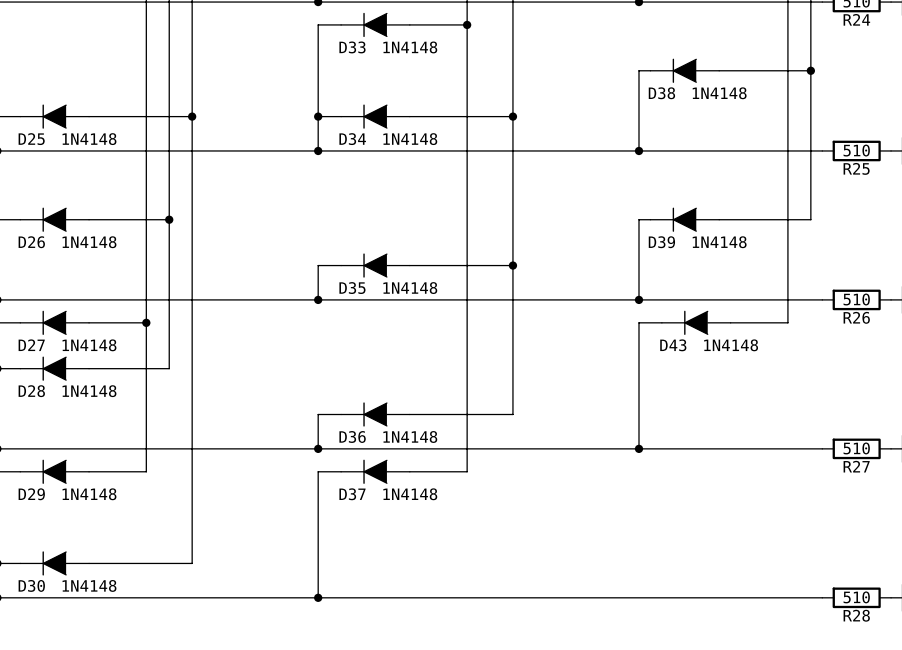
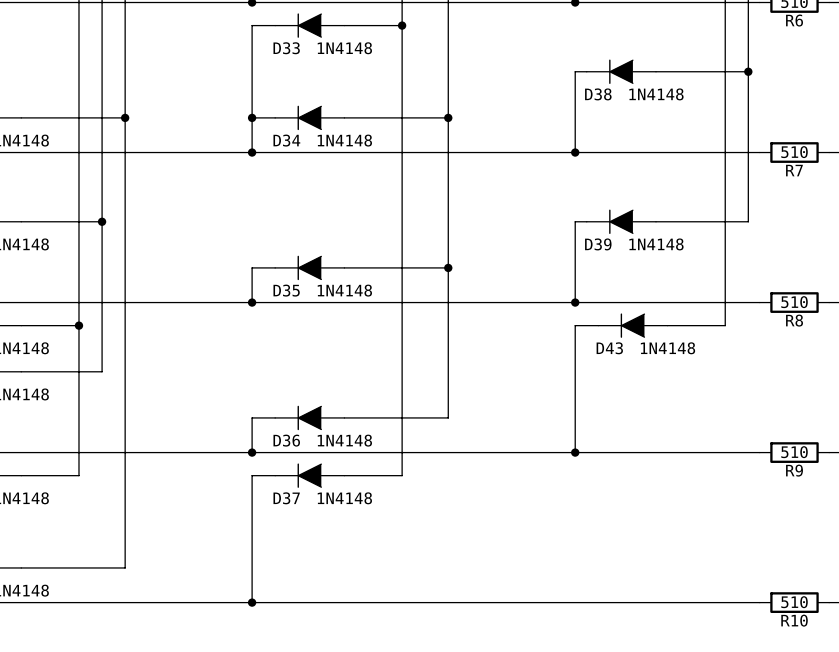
R24 name: R24 (856, 19) -> R6 (794, 20)
R25 name: R25 (856, 168) -> R7 (794, 170)
R26 name: R26 (856, 317) -> R8 (794, 320)
R27 name: R27 (856, 466) -> R9 (794, 470)
R28 name: R28 (856, 615) -> R10 (794, 620)

